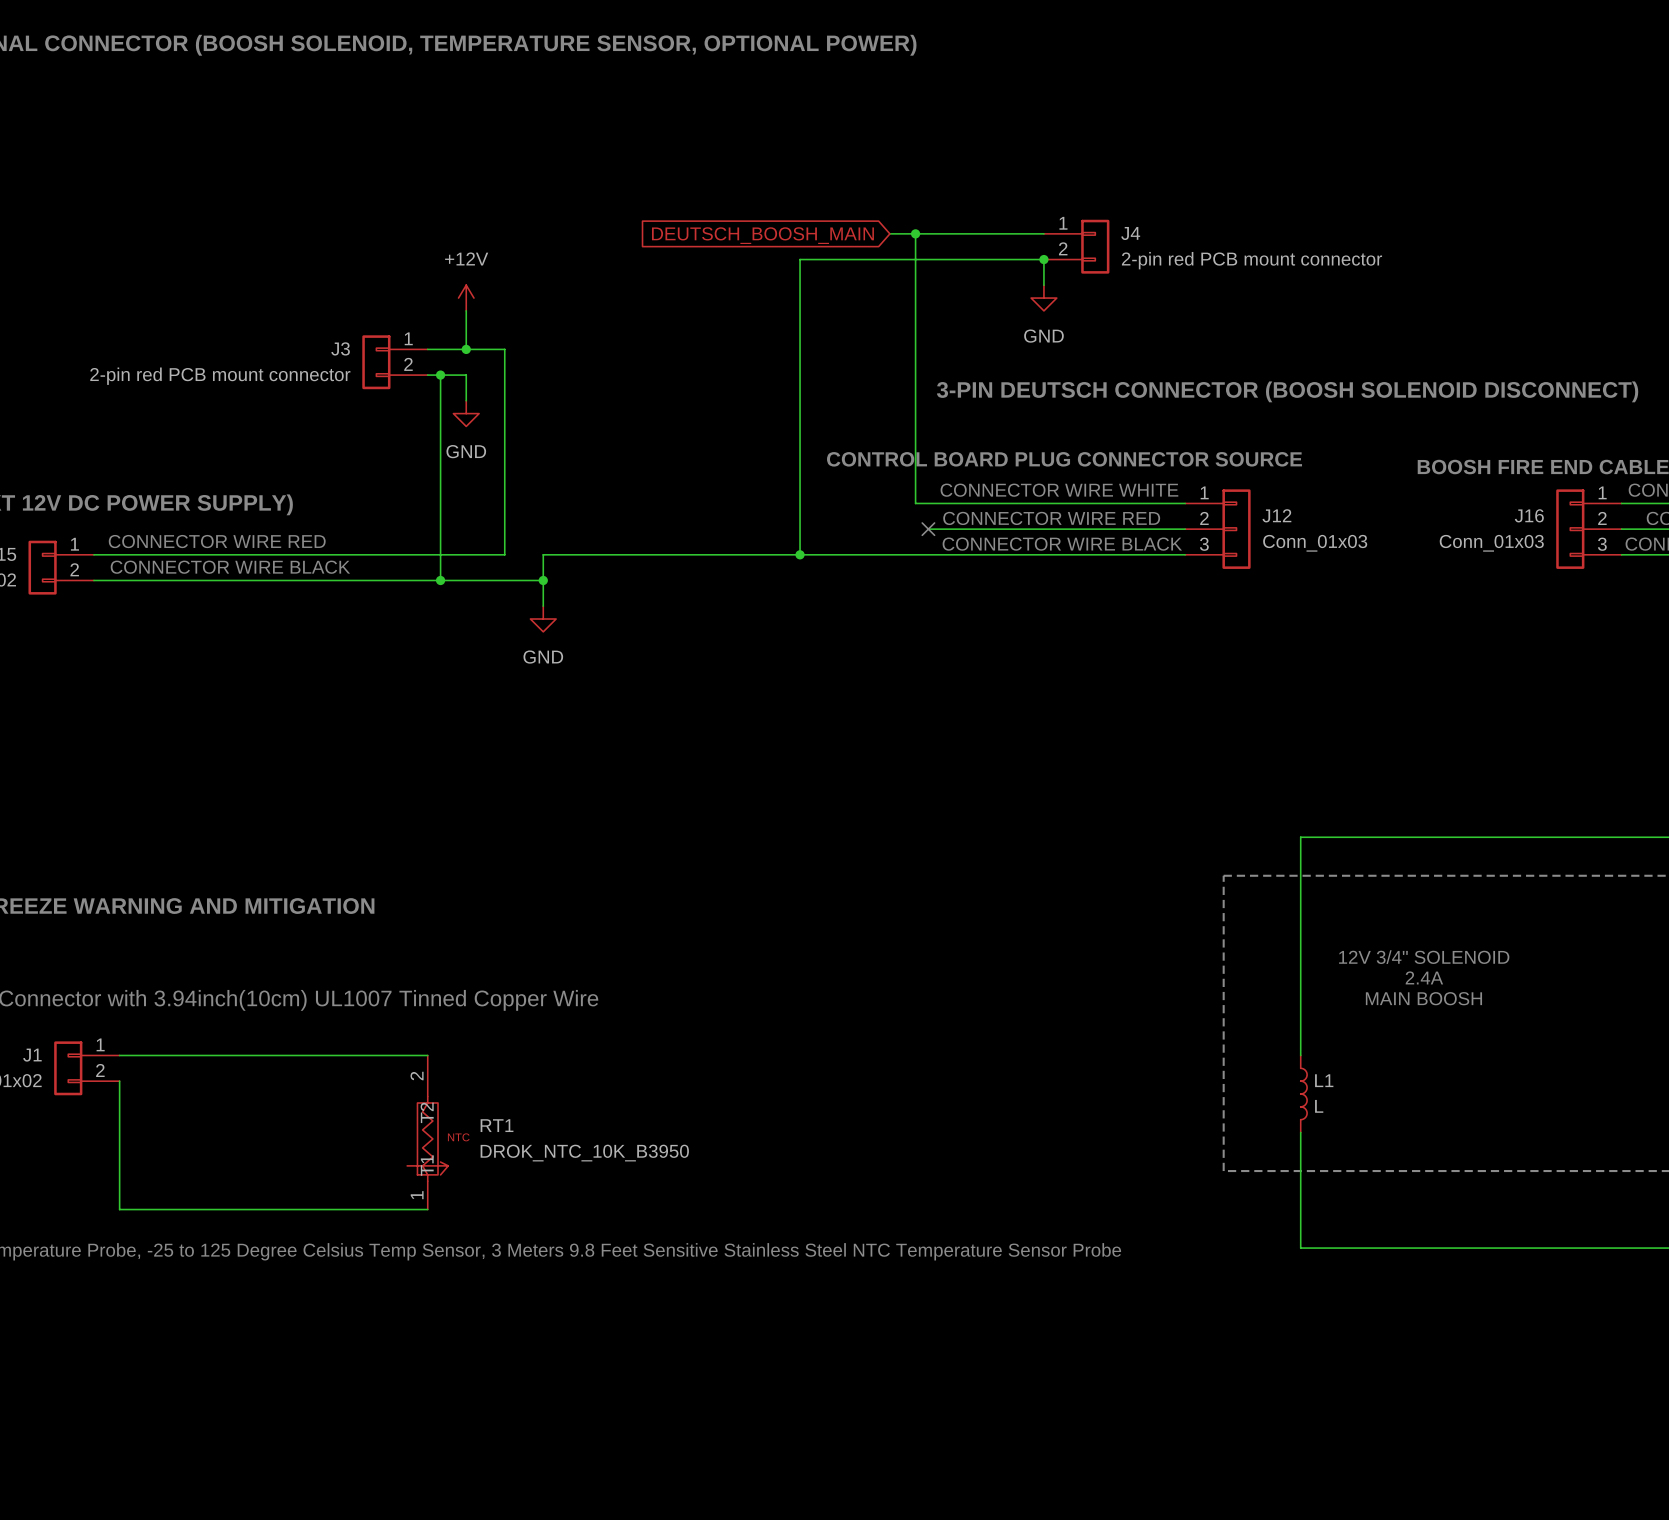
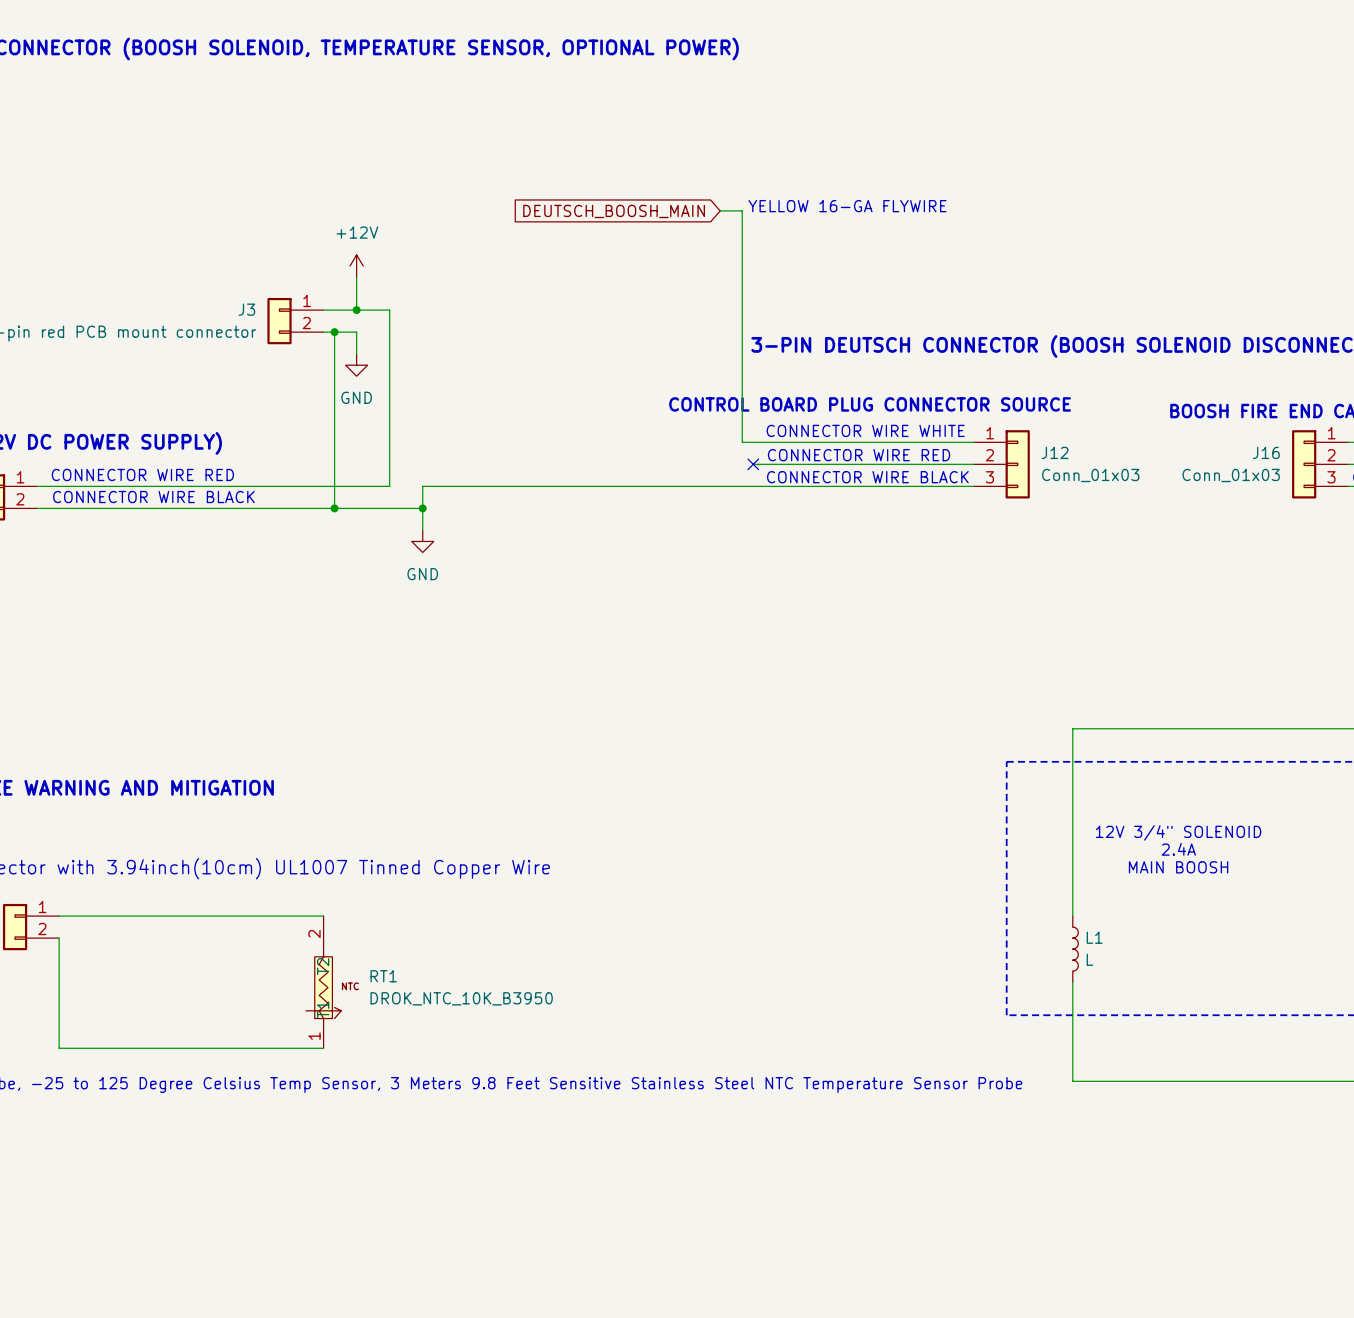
text: none -> YELLOW 16-GA FLYWIRE (847, 206)
wire: (915, 233) (1043, 233) -> none
junction: (915, 233) -> none
J4: 2-pin red PCB mount connector (1076, 246) -> none
junction: (1043, 259) -> none
wire: (1043, 285) (1043, 259) (800, 259) (800, 554) -> none
power symbol: GND (1043, 298) -> none
junction: (800, 554) -> none

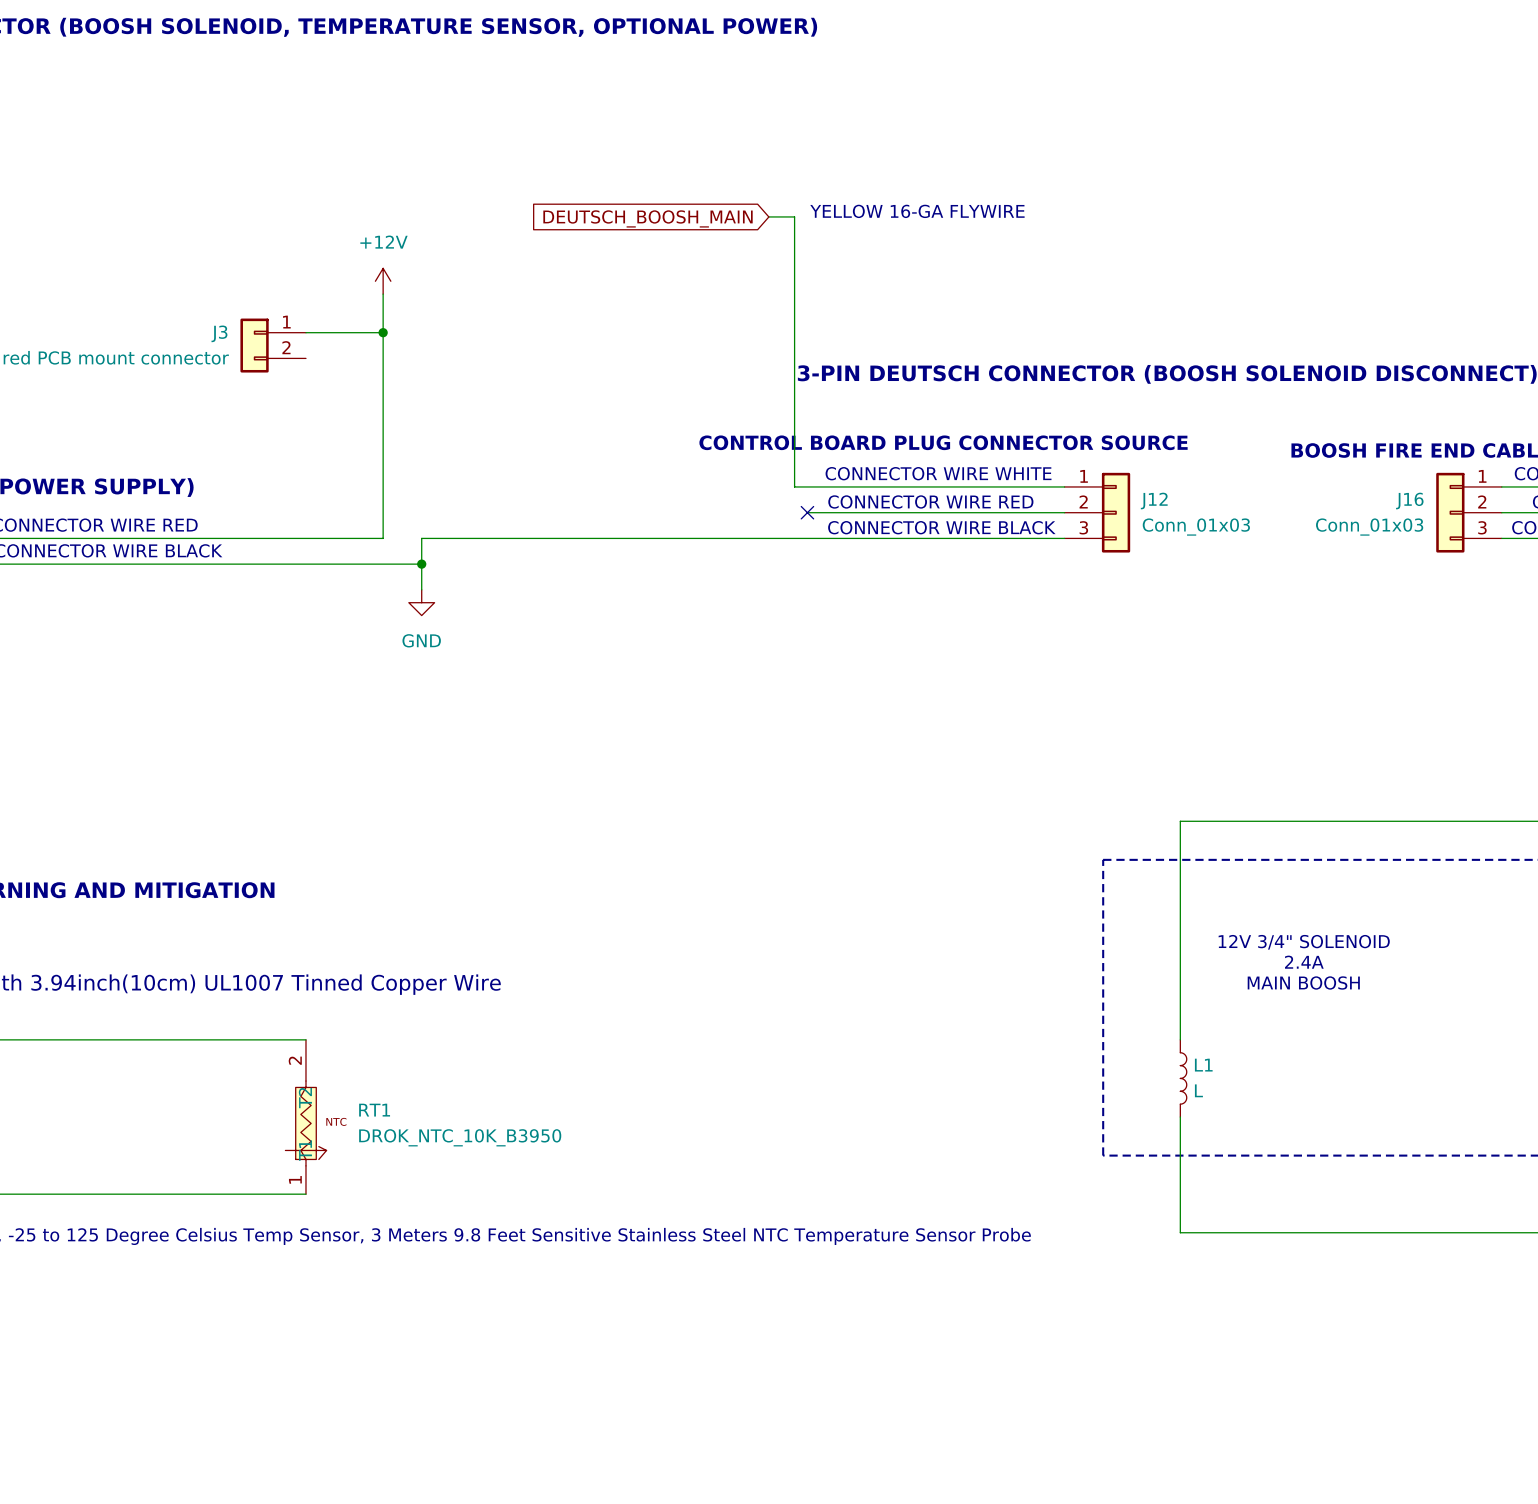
power symbol position: +12V (356, 266) -> +12V (383, 281)
wire: (356, 277) (356, 310) -> (383, 294) (383, 332)
junction: (356, 310) -> none
junction: none -> (383, 332)
wire: (323, 332) (356, 332) (356, 354) -> none
wire: (334, 332) (334, 508) -> none
junction: (334, 332) -> none
power symbol: GND (356, 365) -> none
junction: (334, 508) -> none

